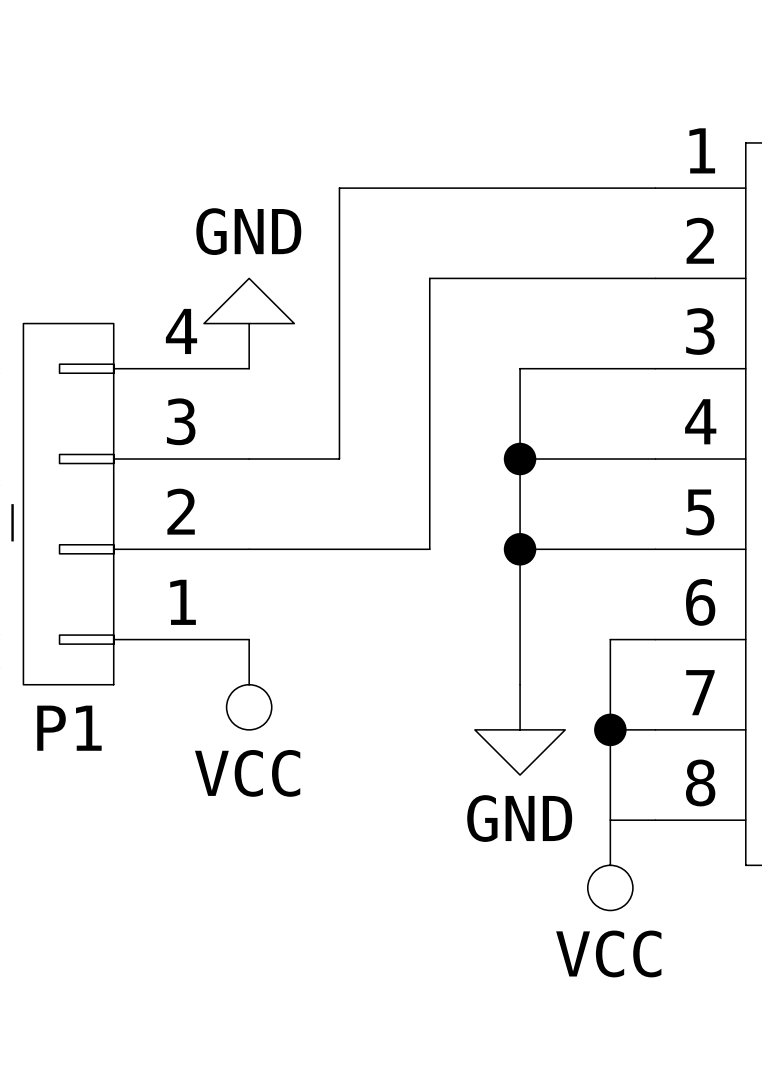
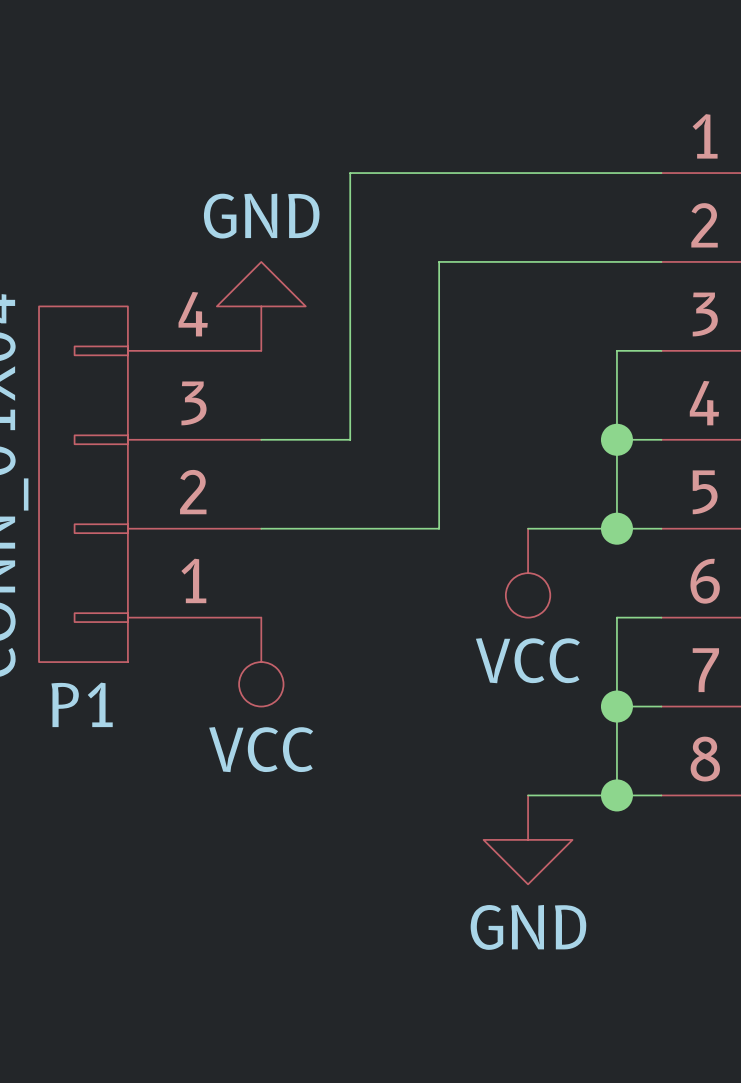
wire: (610, 368) (520, 368) (520, 684) -> (616, 350) (616, 528)
wire: (520, 459) (610, 459) -> (528, 795) (616, 795)
junction: (520, 459) -> none
junction: none -> (616, 439)
junction: (520, 549) -> none
junction: none -> (616, 528)
power symbol position: GND (520, 729) -> GND (528, 839)
junction: none -> (616, 795)
power symbol position: VCC (610, 865) -> VCC (528, 573)

